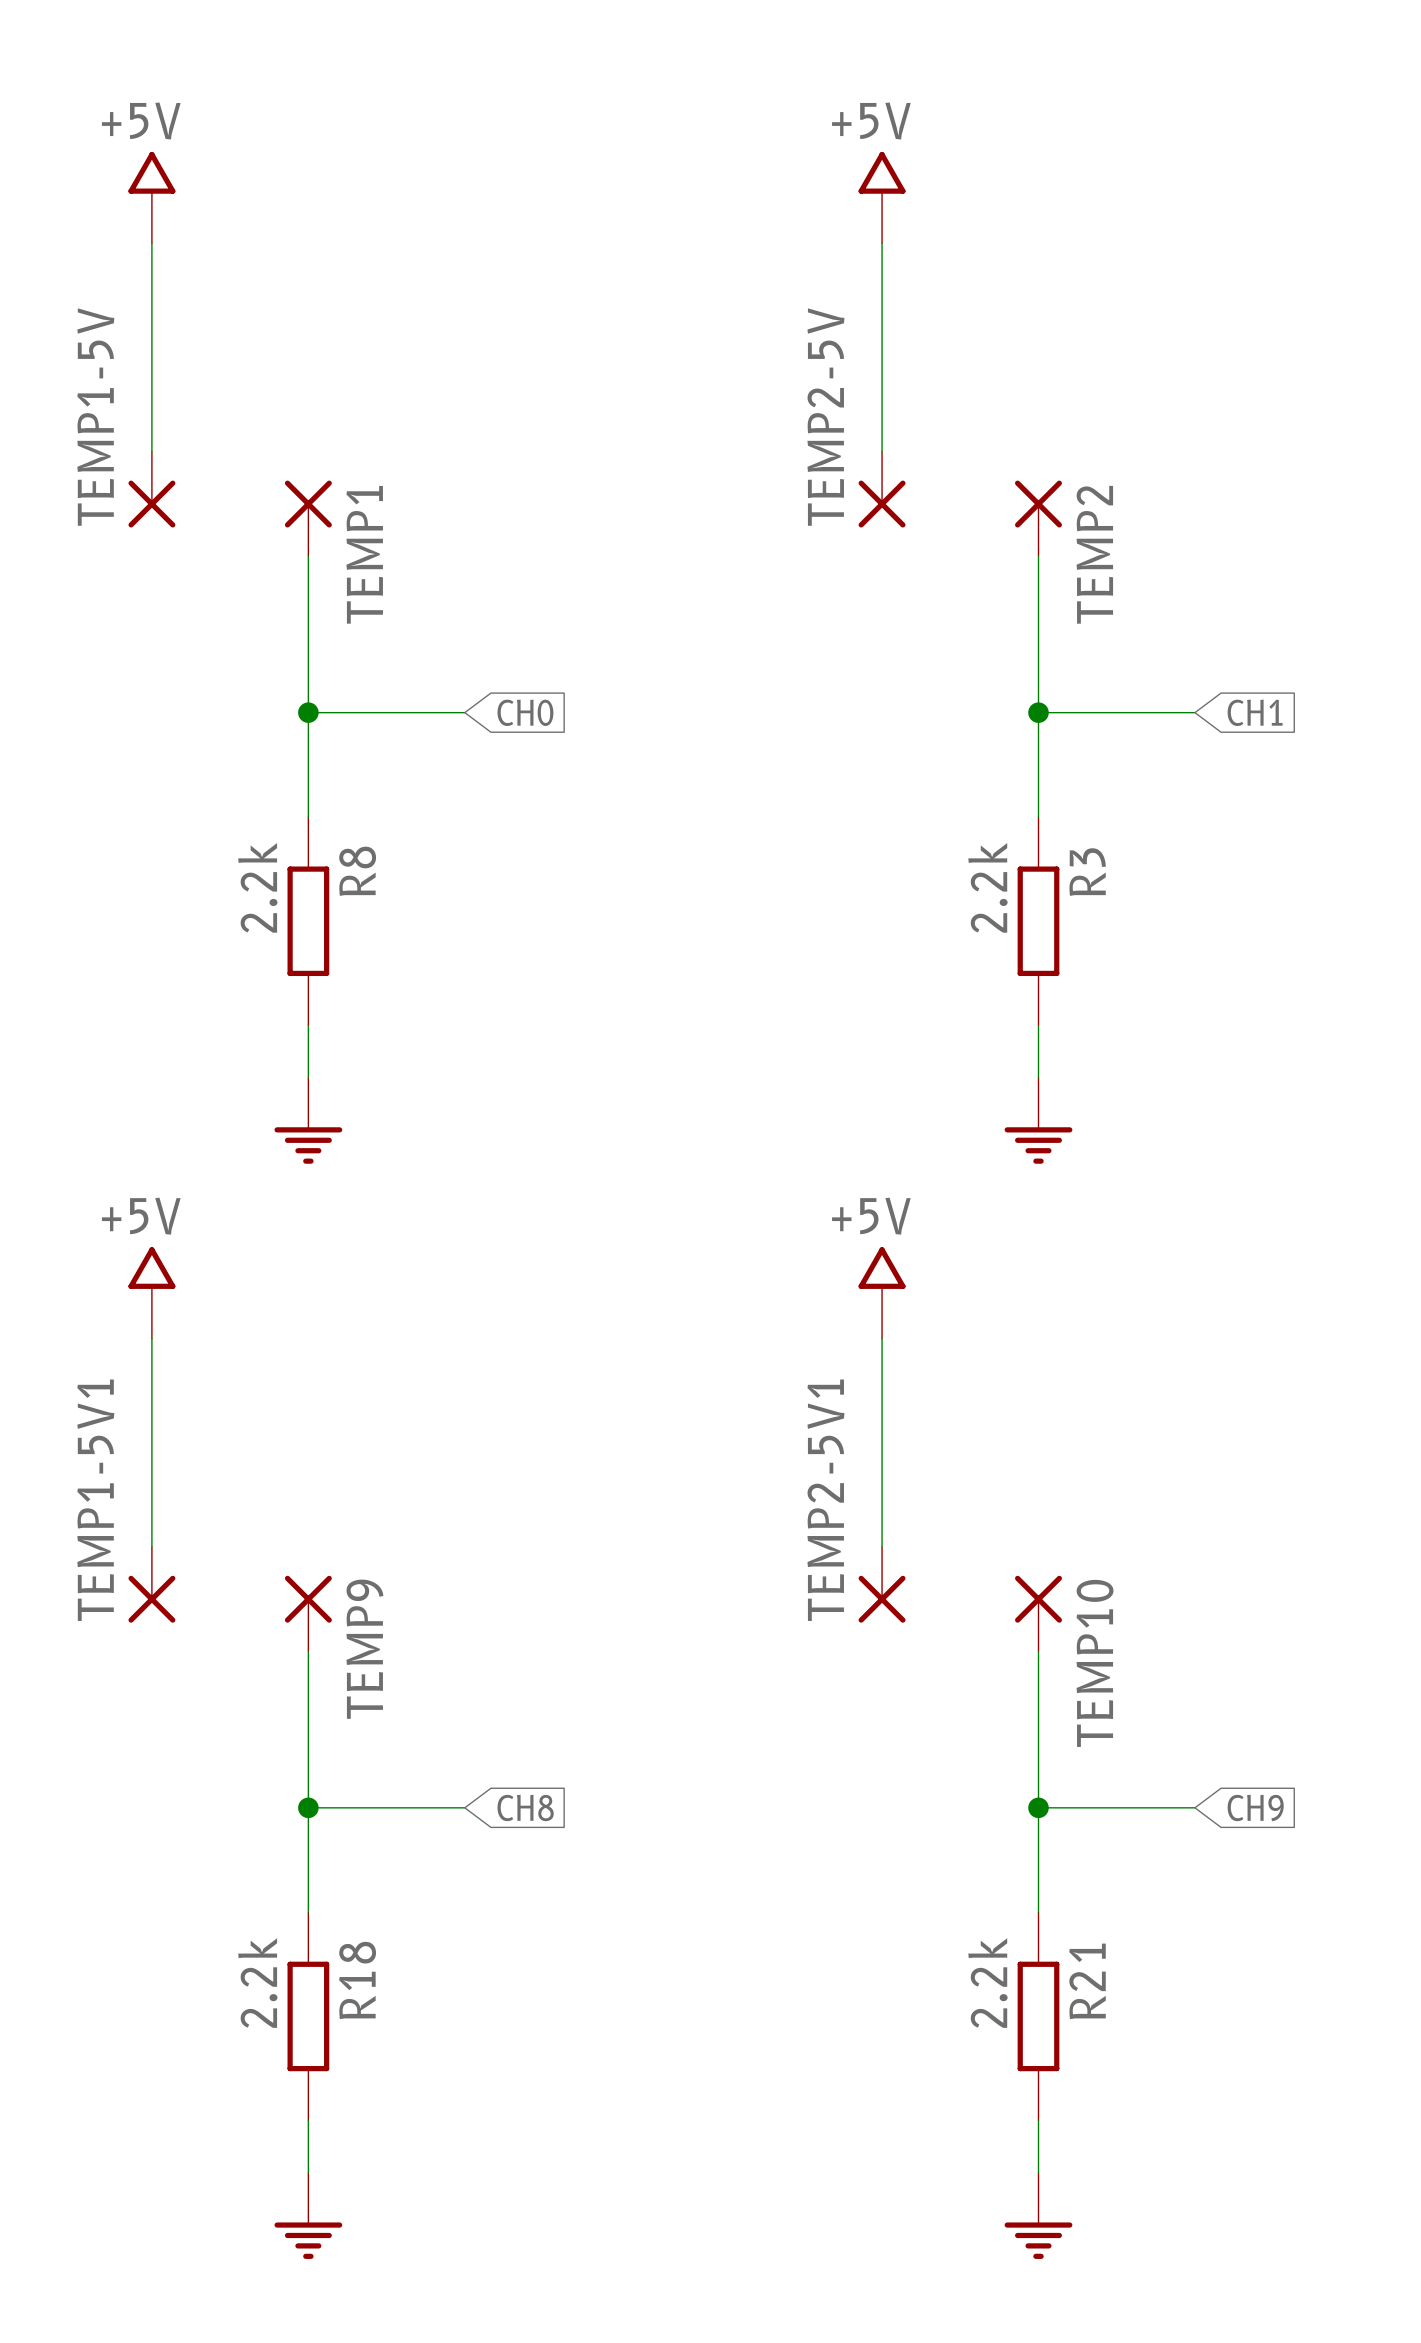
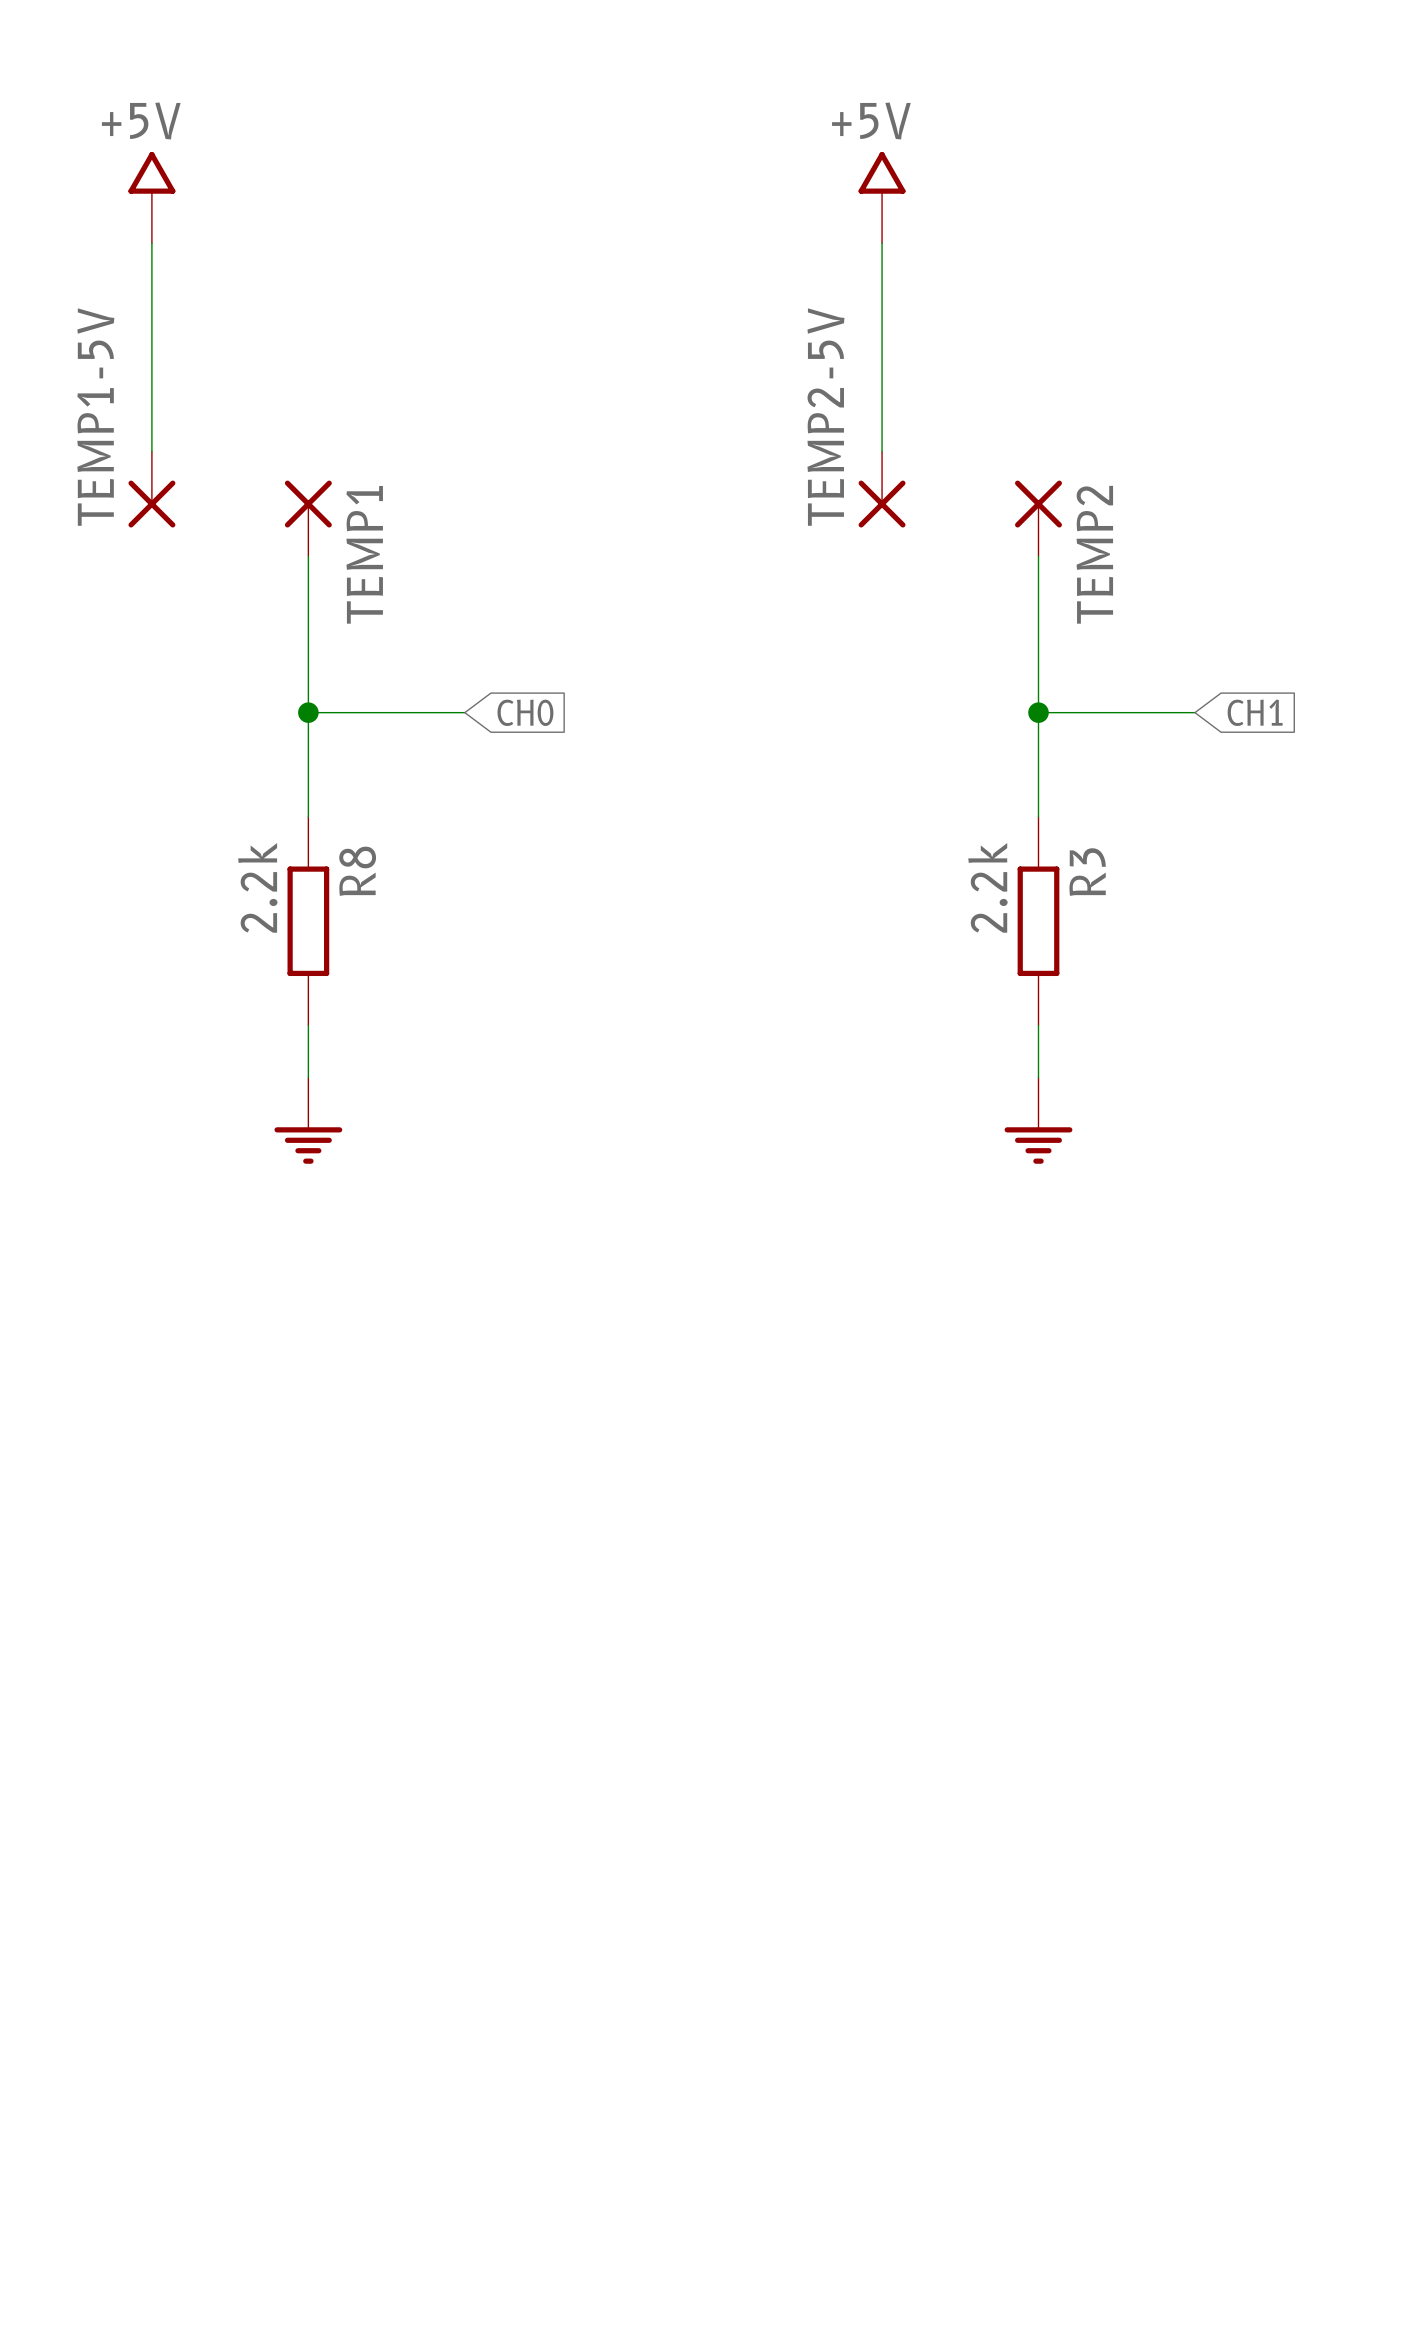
power symbol: +5V (151, 1292) -> none
power symbol: +5V (882, 1292) -> none
wire: (151, 1338) (151, 1547) -> none
wire: (882, 1338) (882, 1547) -> none
TEMP1-5V1: (151, 1584) -> none
TEMP2-5V1: (882, 1584) -> none
TEMP9: (308, 1613) -> none
TEMP10: (1038, 1613) -> none
wire: (308, 1651) (308, 1912) -> none
wire: (1038, 1651) (1038, 1912) -> none
wire: (308, 1807) (464, 1807) -> none
junction: (308, 1807) -> none
global label: CH8 (525, 1807) -> none
wire: (1038, 1807) (1194, 1807) -> none
junction: (1038, 1807) -> none
global label: CH9 (1255, 1807) -> none
R18: 2.2k (308, 2016) -> none
R21: 2.2k (1038, 2016) -> none
wire: (308, 2120) (308, 2172) -> none
wire: (1038, 2120) (1038, 2172) -> none
power symbol: (308, 2215) -> none
power symbol: (1038, 2215) -> none

